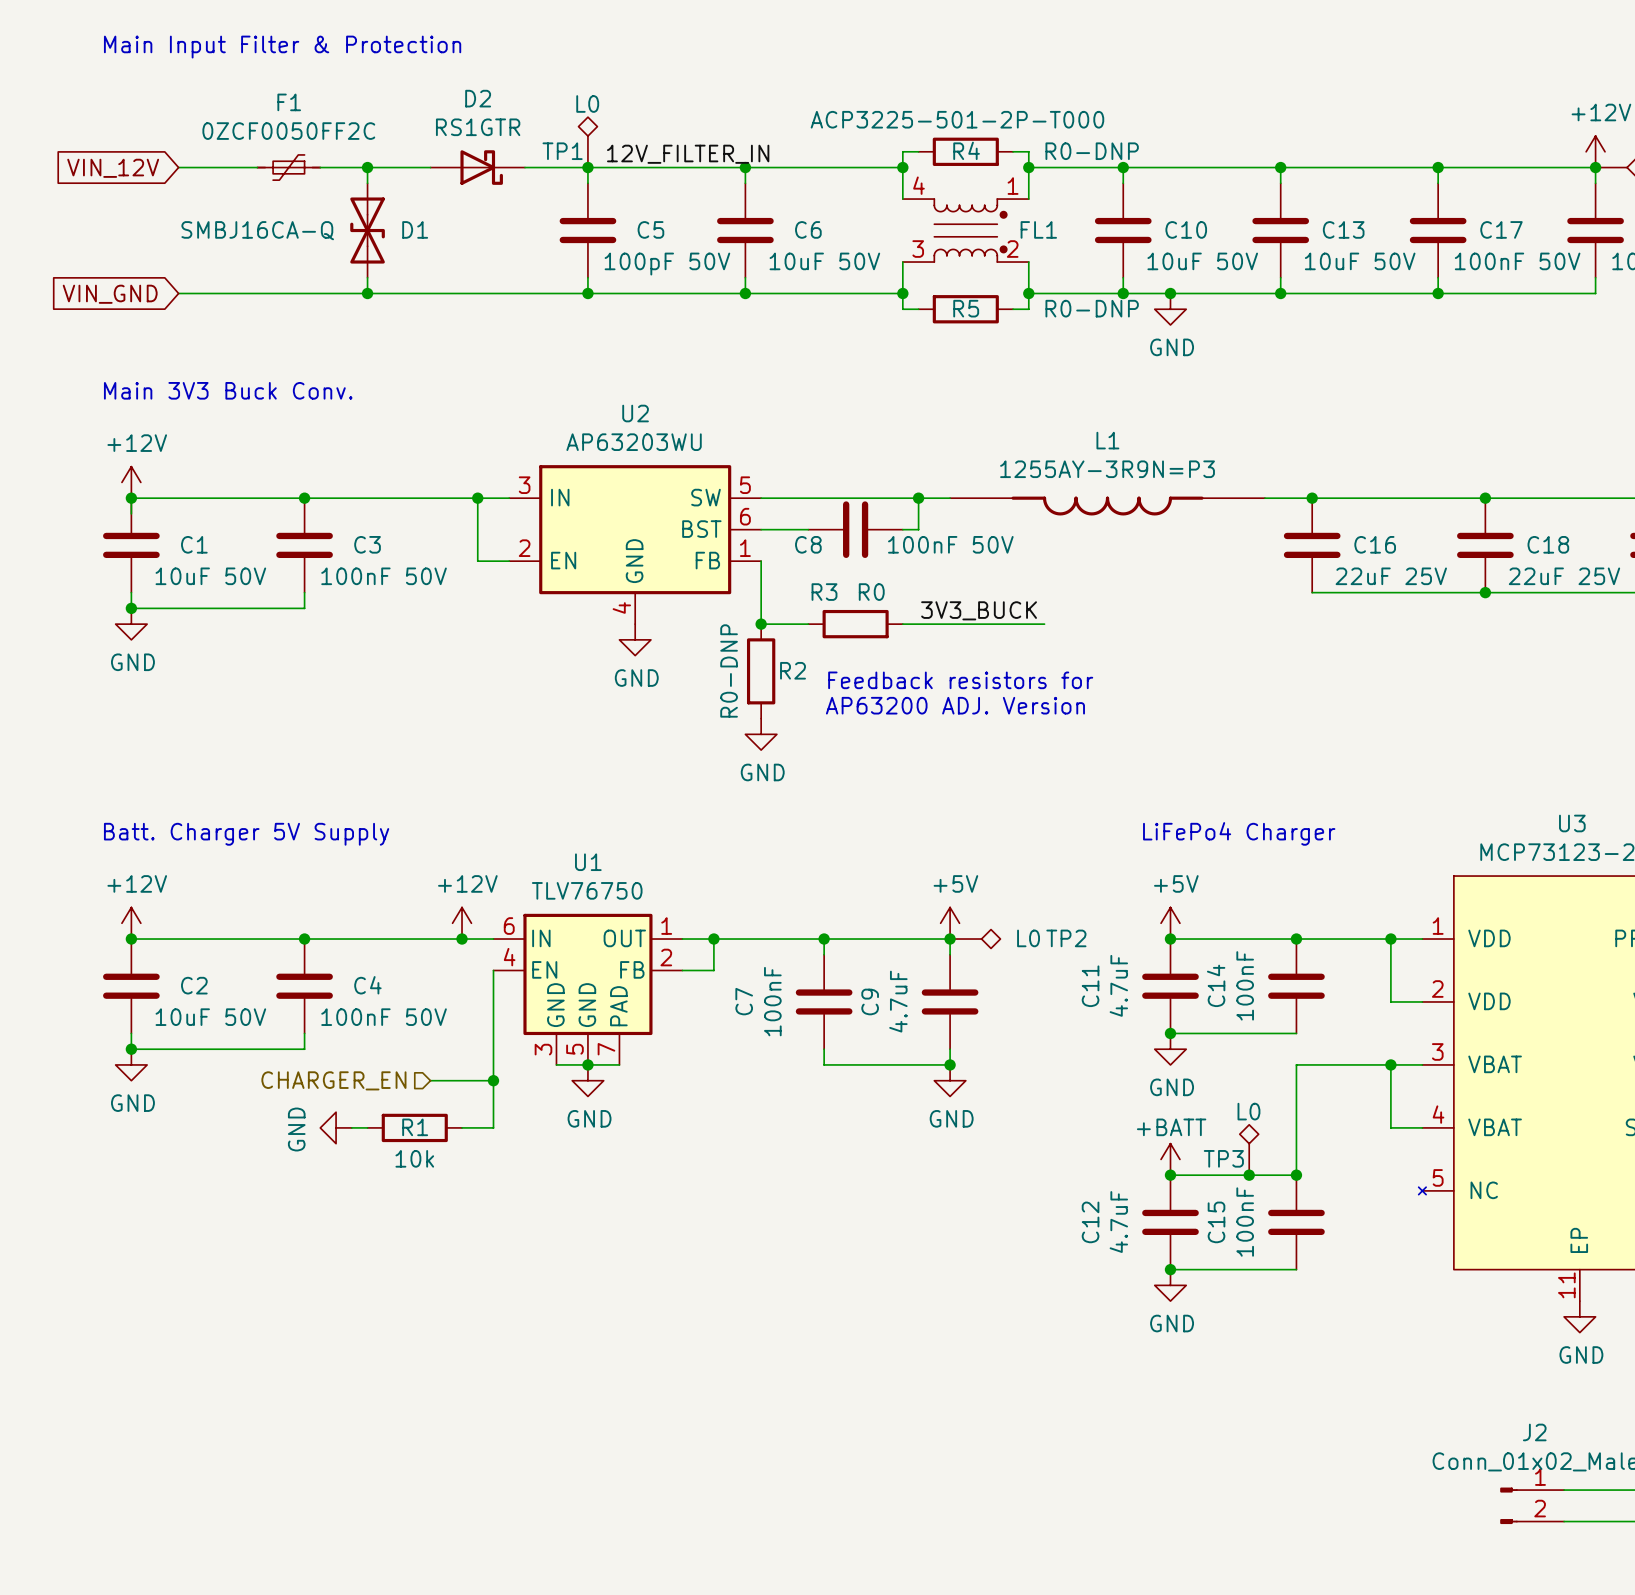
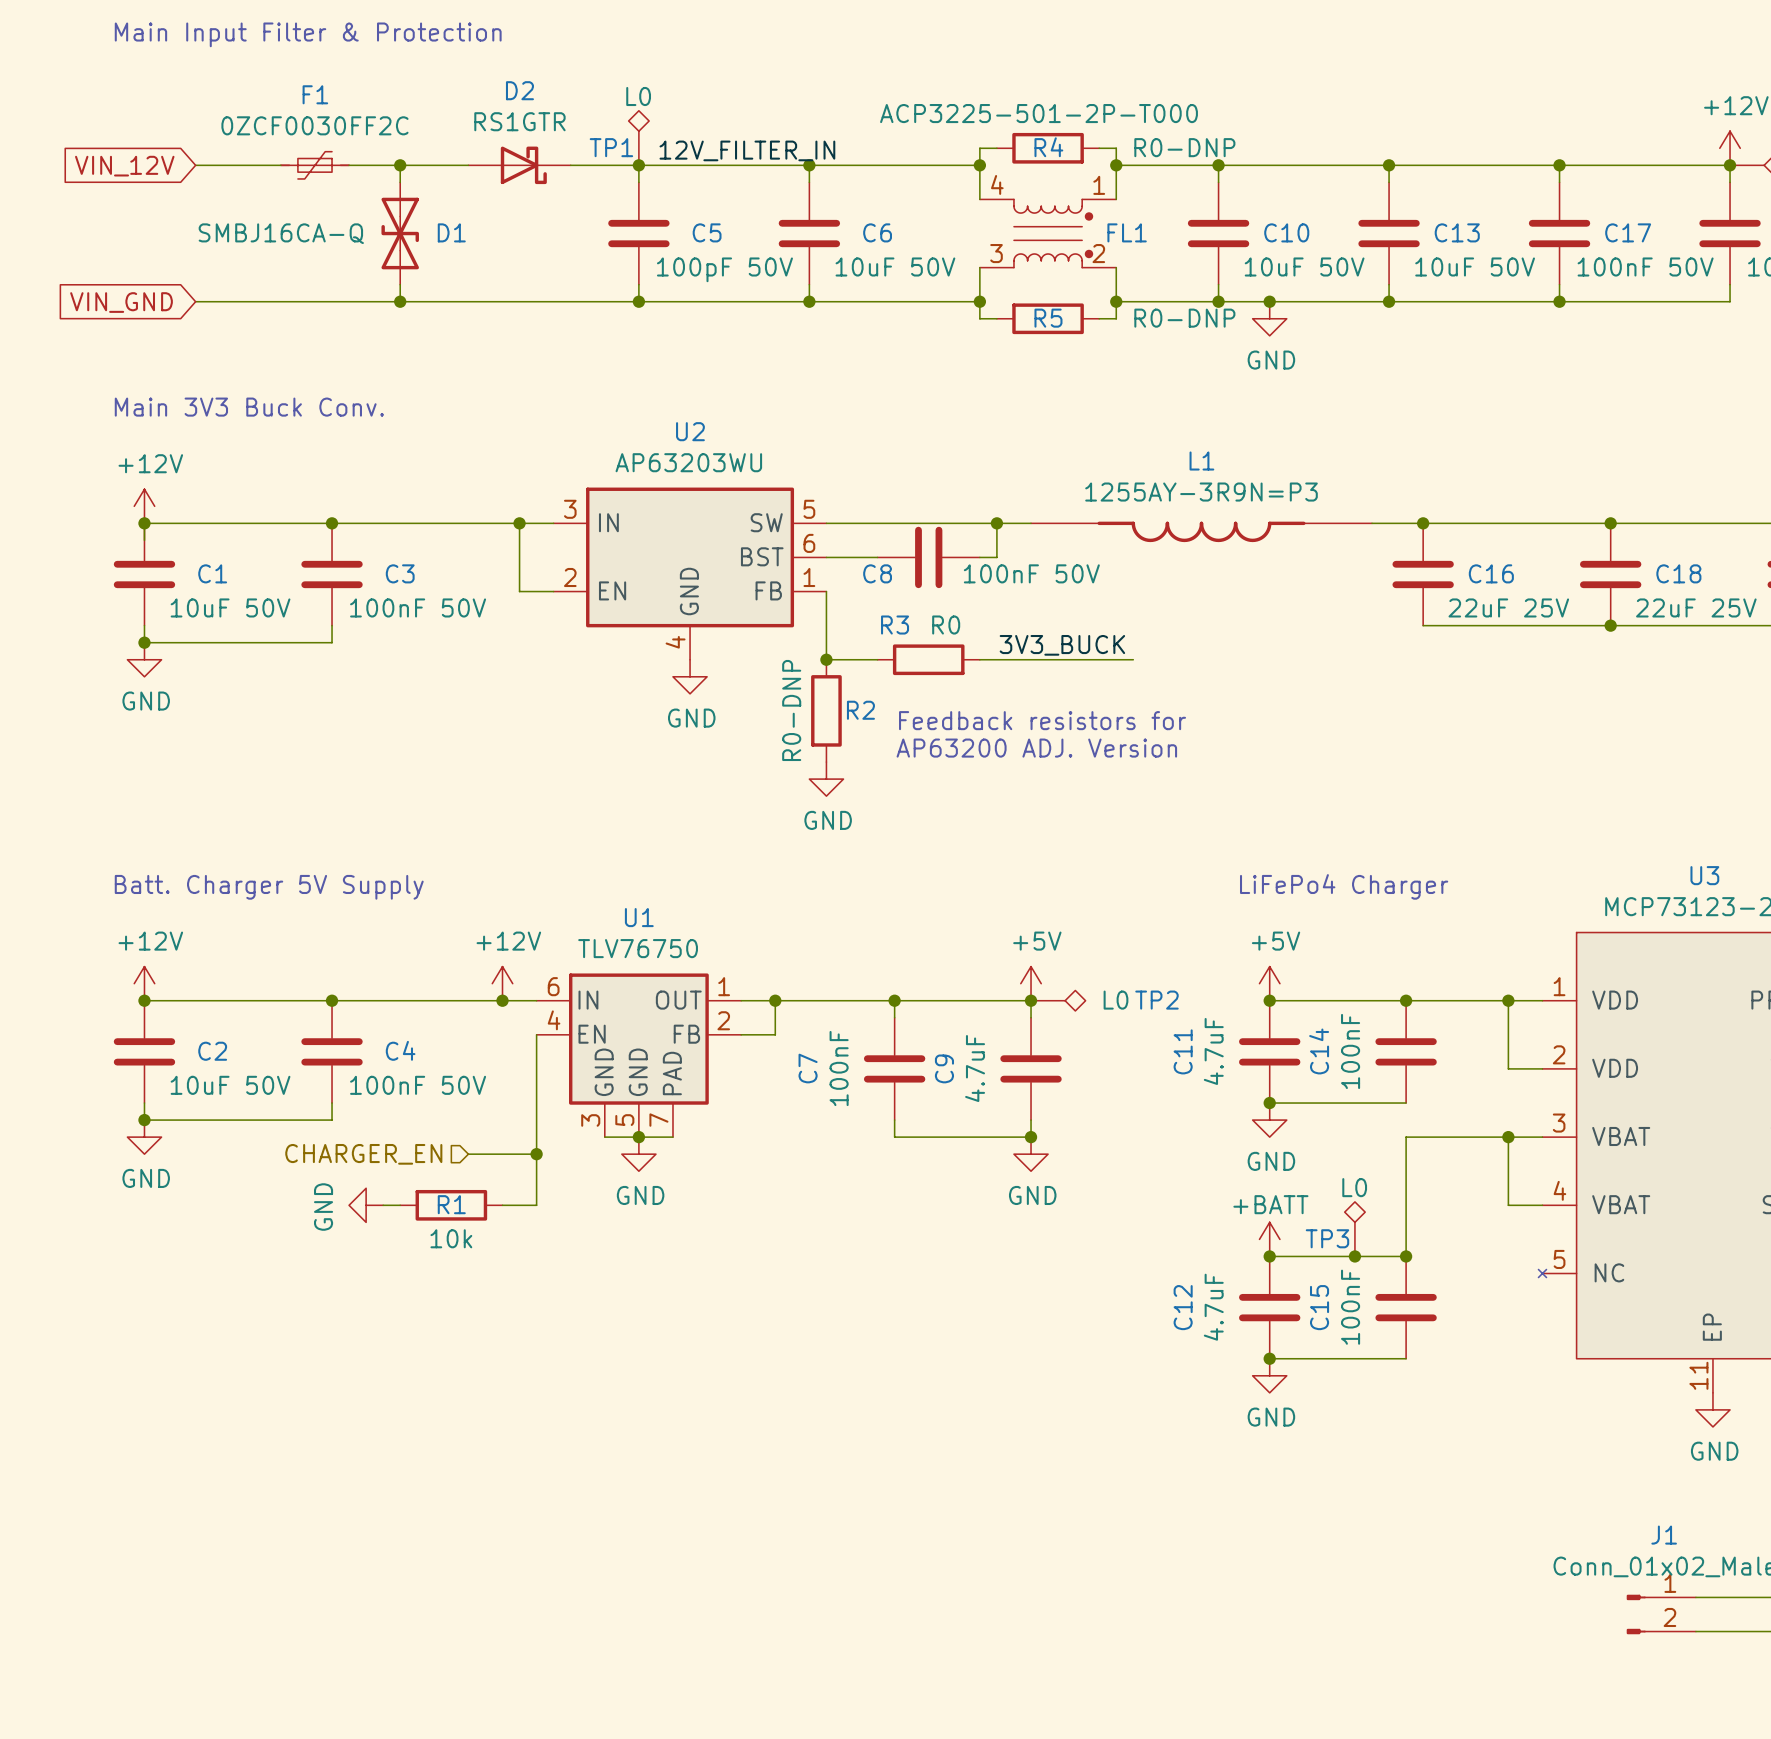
F1 value: 0ZCF0050FF2C (288, 131) -> 0ZCF0030FF2C (314, 125)
J2 name: J2 (1534, 1432) -> J1 (1664, 1535)

